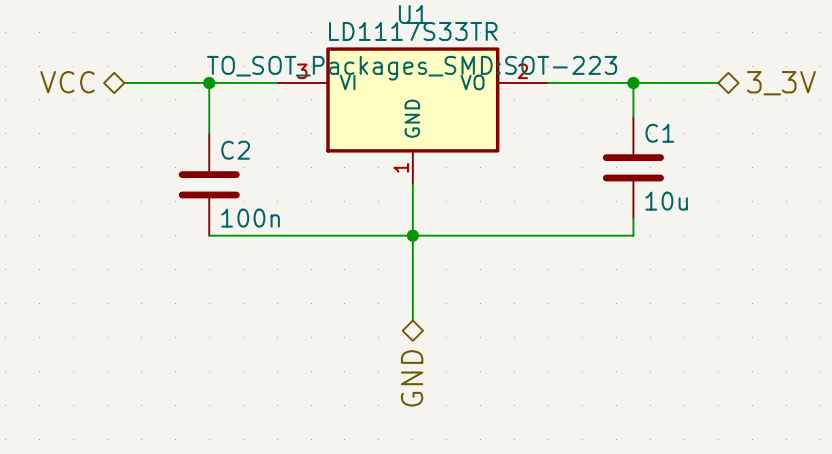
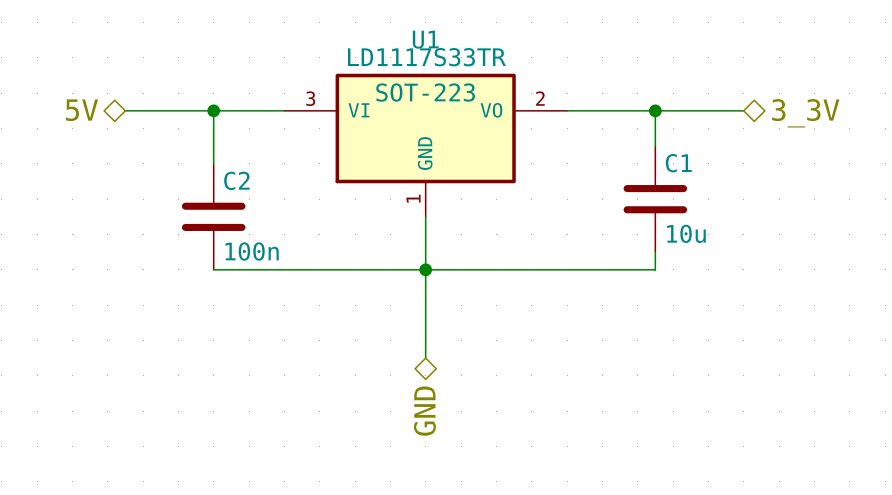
U1 text: TO_SOT_Packages_SMD:SOT-223 (412, 68) -> SOT-223 (425, 92)
hierarchical label: VCC (67, 82) -> 5V (81, 110)

